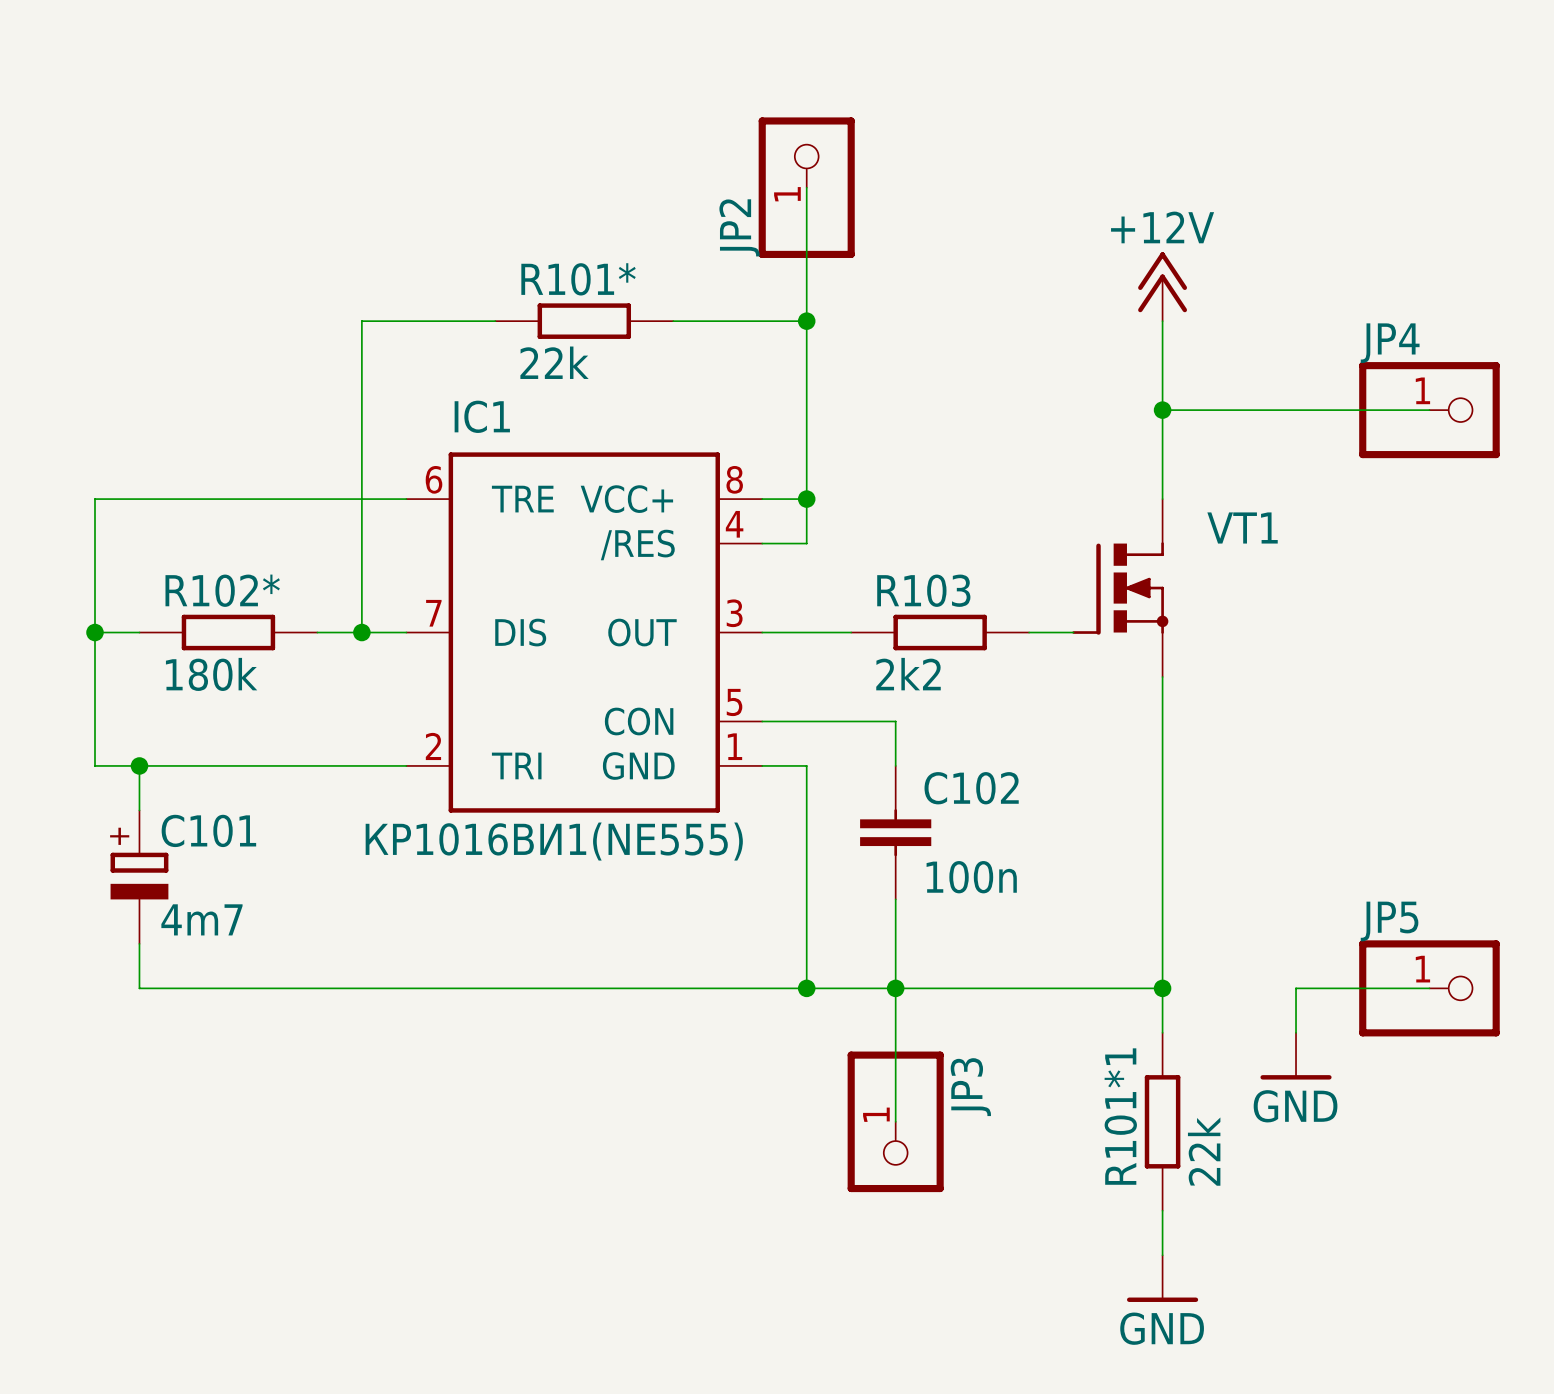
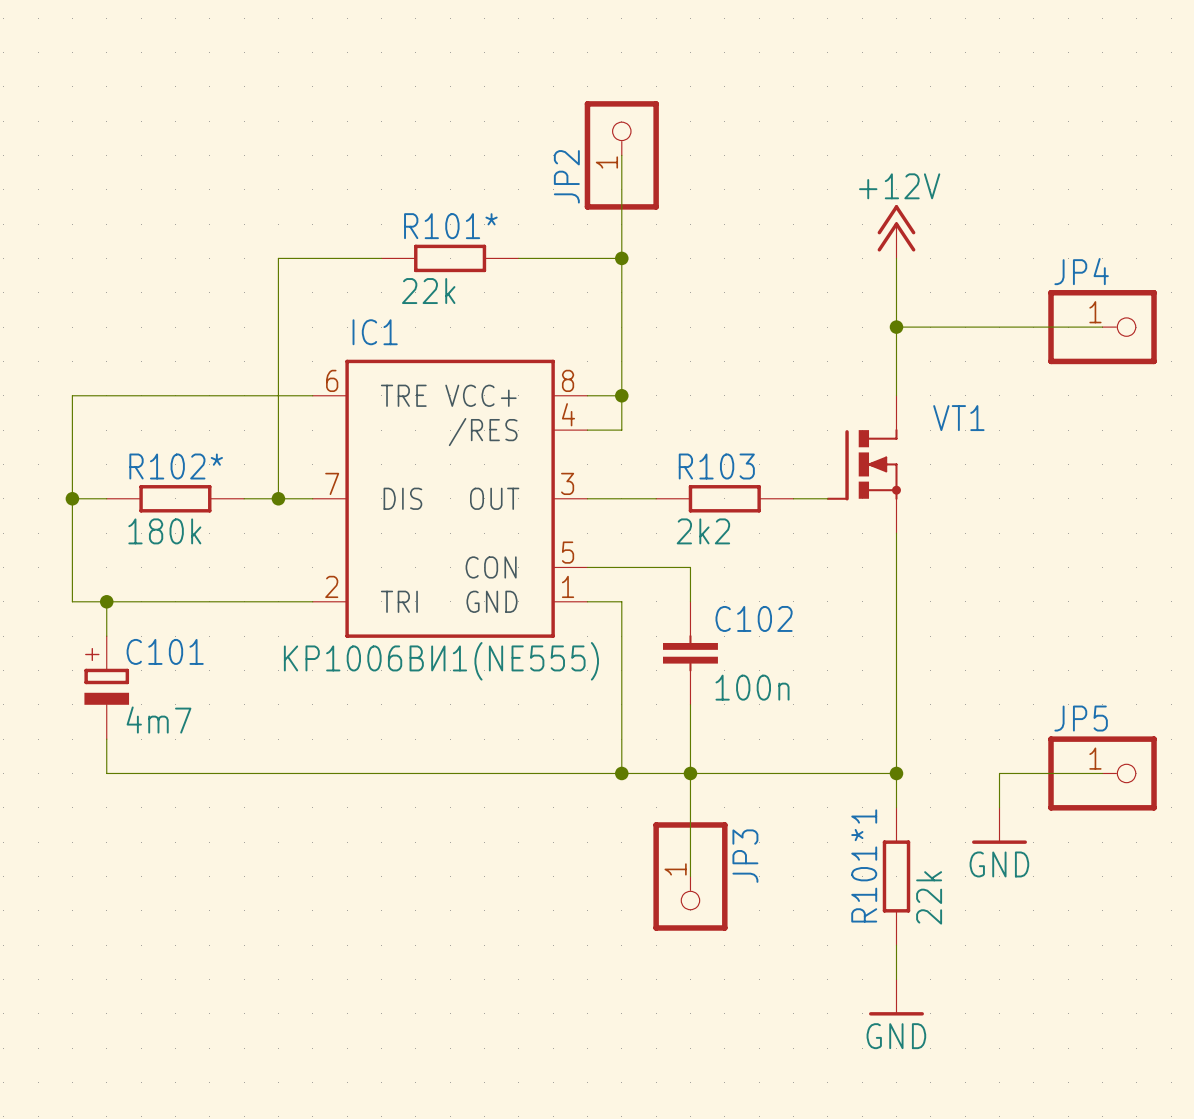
IC1 value: КР1016ВИ1(NE555) (554, 841) -> КР1006ВИ1(NE555) (441, 661)

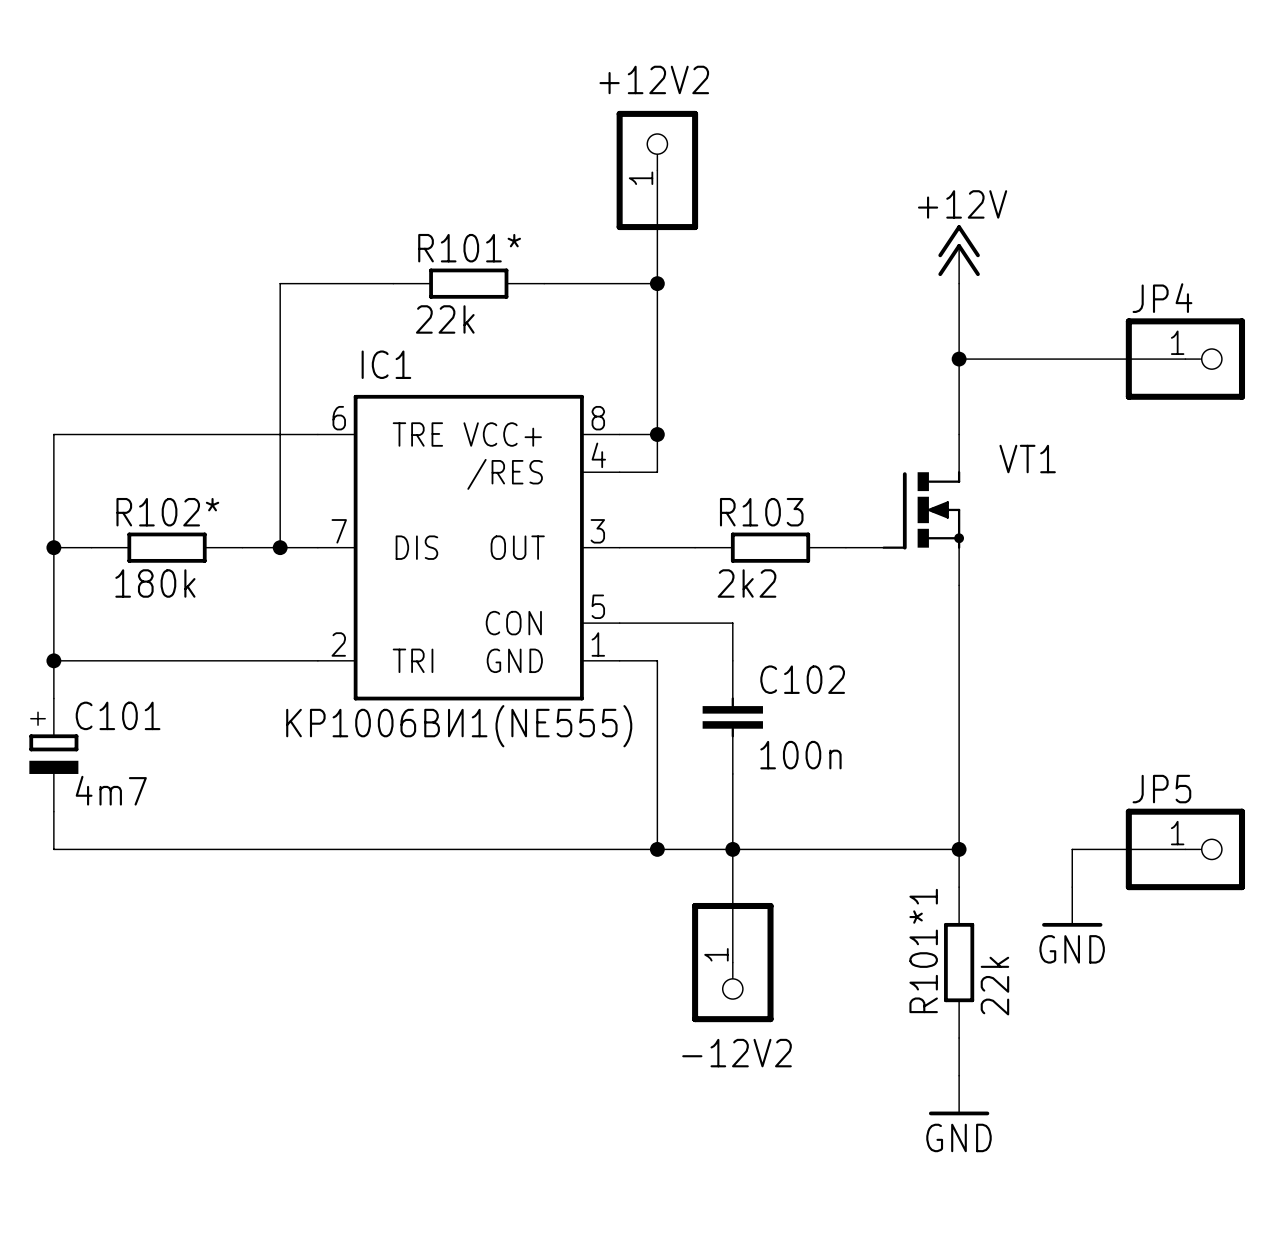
JP2 name: JP2 (566, 176) -> +12V2 (654, 79)
wire: (106, 601) (106, 636) -> (53, 660) (53, 698)
junction position: (106, 601) -> (53, 660)
C101 position: (106, 687) -> (53, 755)
wire: (106, 739) (106, 773) -> (53, 811) (53, 849) (91, 849)
JP3 name: JP3 (745, 856) -> -12V2 (737, 1053)

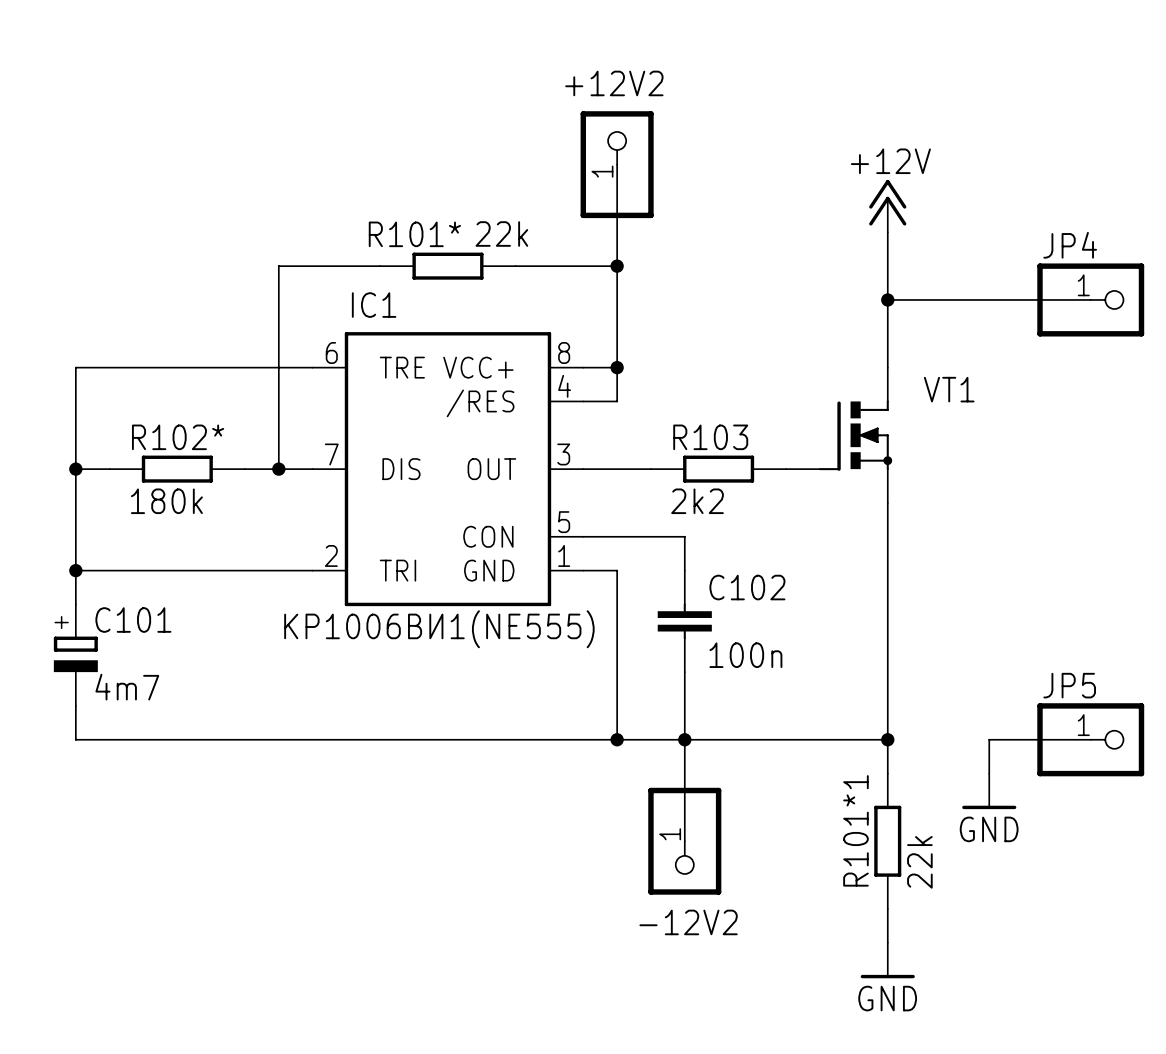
wire: (657, 170) (657, 208) -> none
+12V2 position: (657, 170) -> (617, 164)
R101* name position: R101* (469, 248) -> R101* (414, 234)
wire: (393, 283) (280, 283) (280, 321) -> (380, 266) (278, 266)
R101* position: (468, 283) -> (447, 266)
wire: (544, 283) (657, 283) -> (515, 266) (617, 266)
junction position: (657, 283) -> (617, 266)
R101* value position: 22k (445, 319) -> 22k (501, 234)

